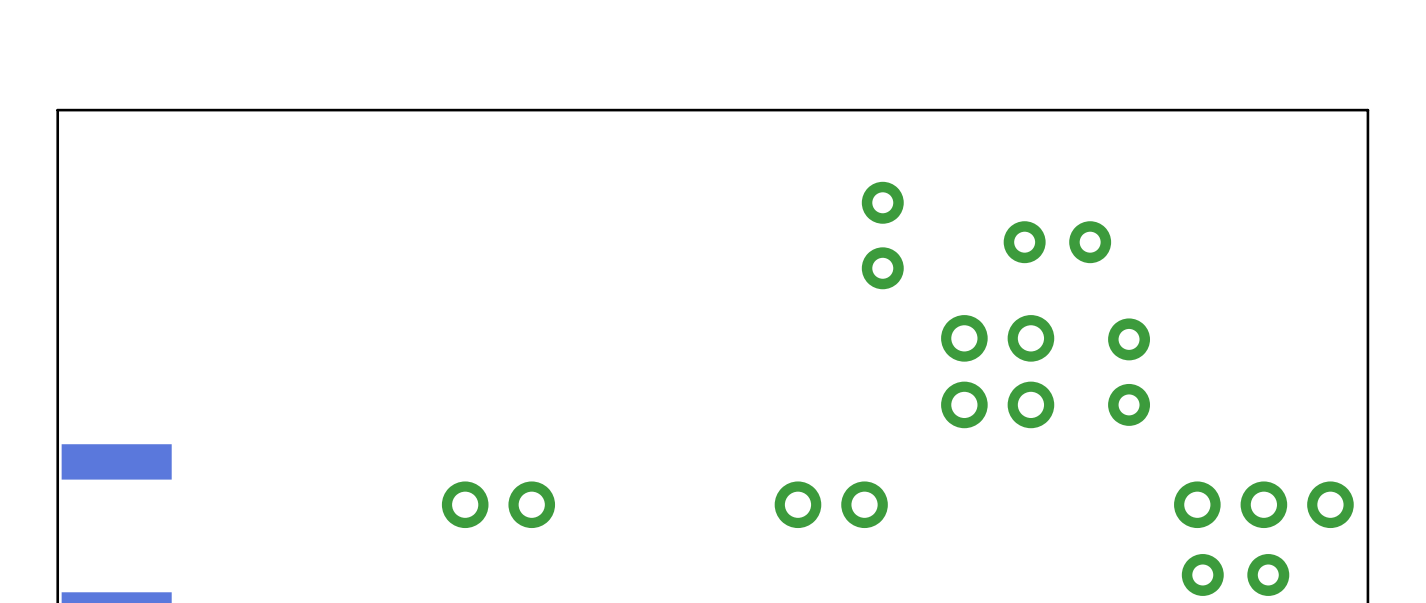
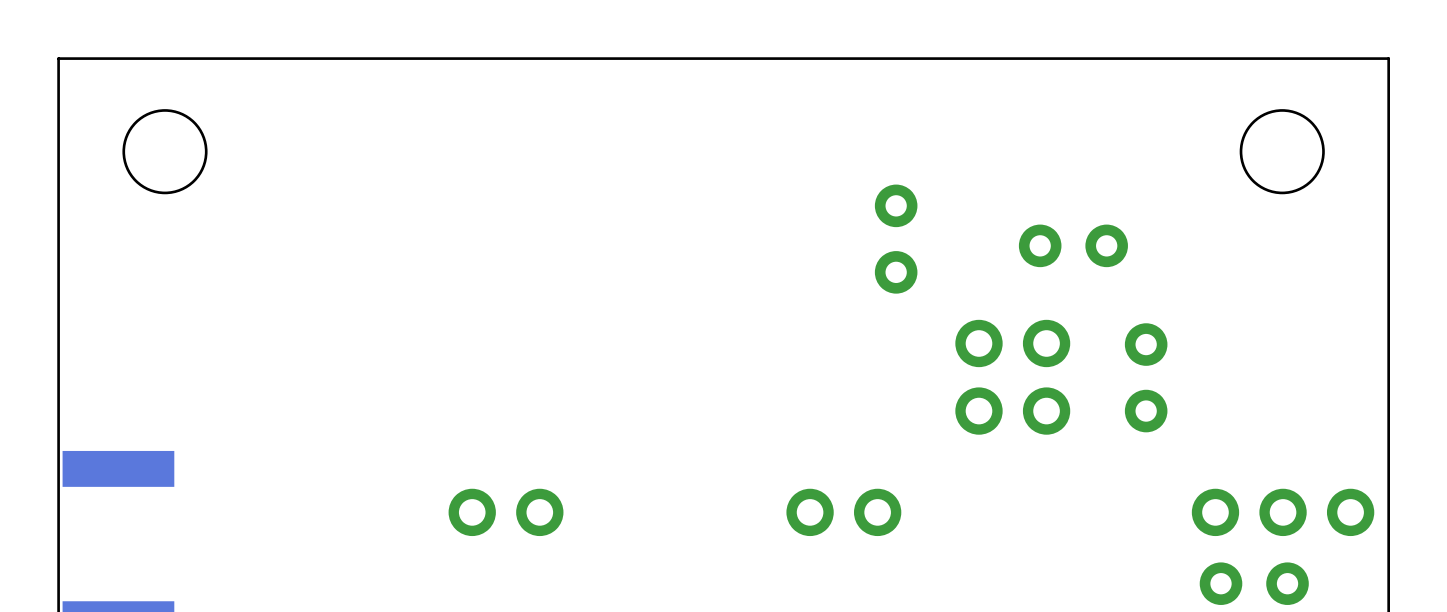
round board edge: none -> [122, 109, 208, 195]
round board edge: none -> [1239, 109, 1325, 195]
board edge: (1367, 110) (57, 110) -> (1388, 111) (1388, 58) (58, 58) (58, 111)

